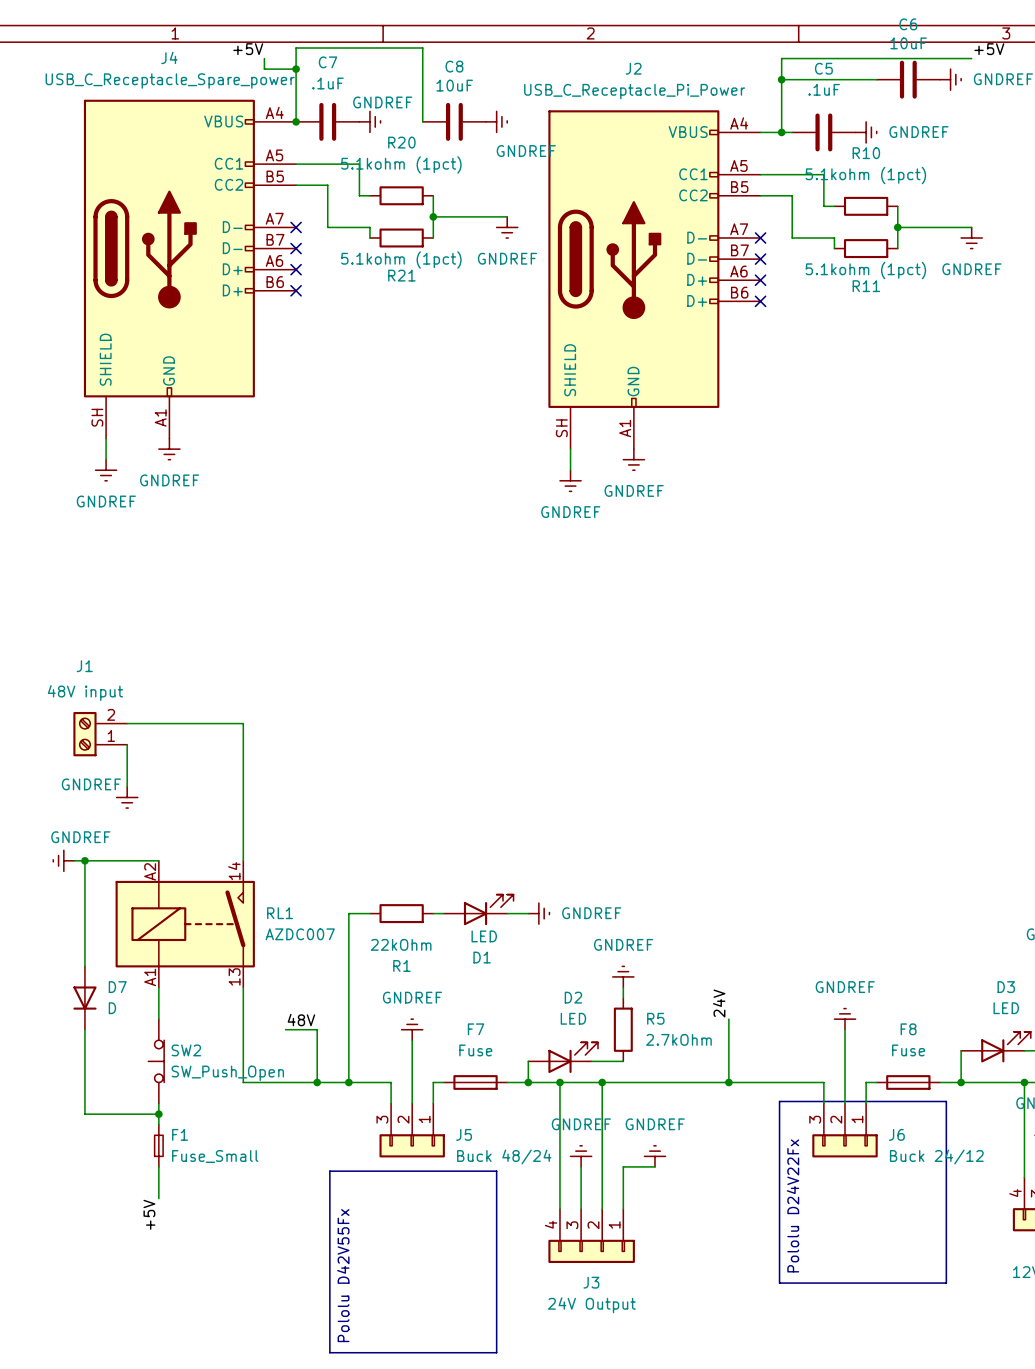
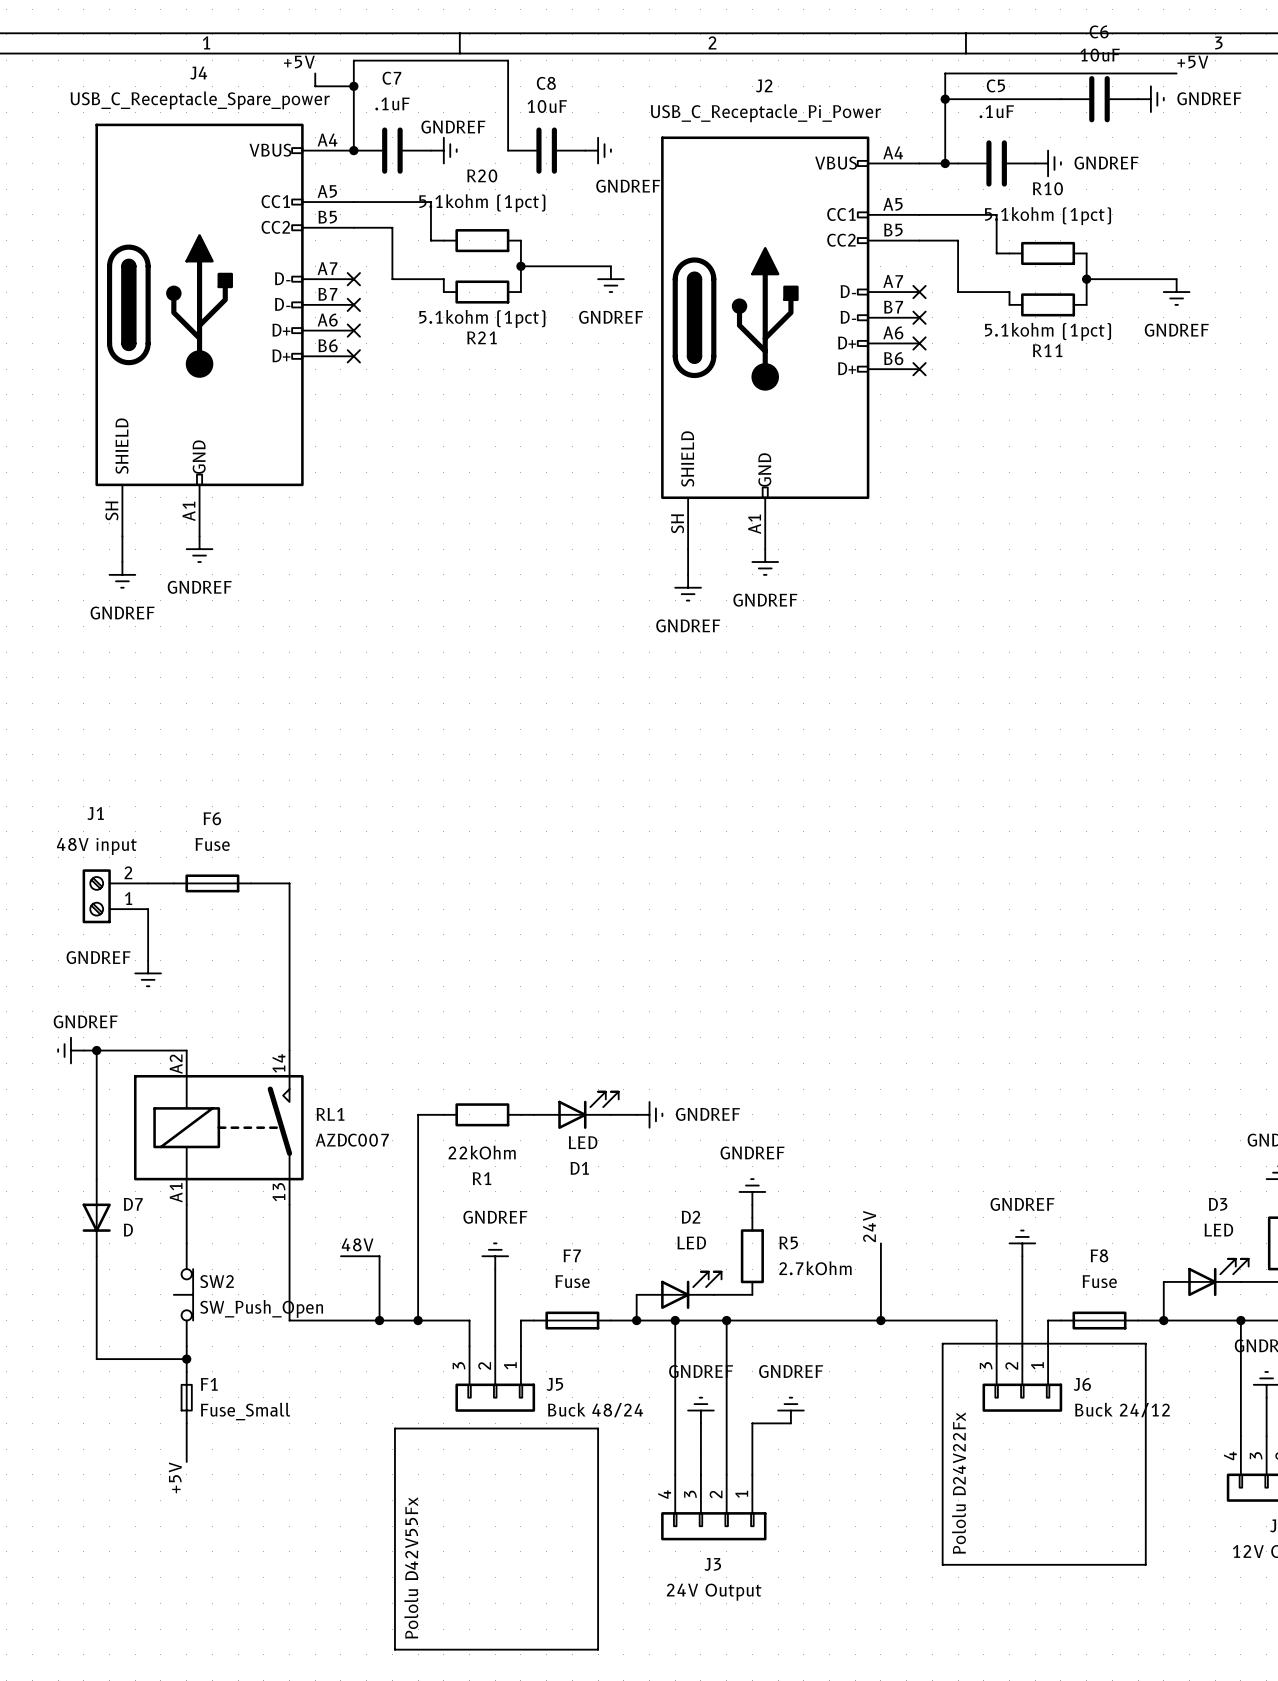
F6: none -> Fuse (212, 883)

